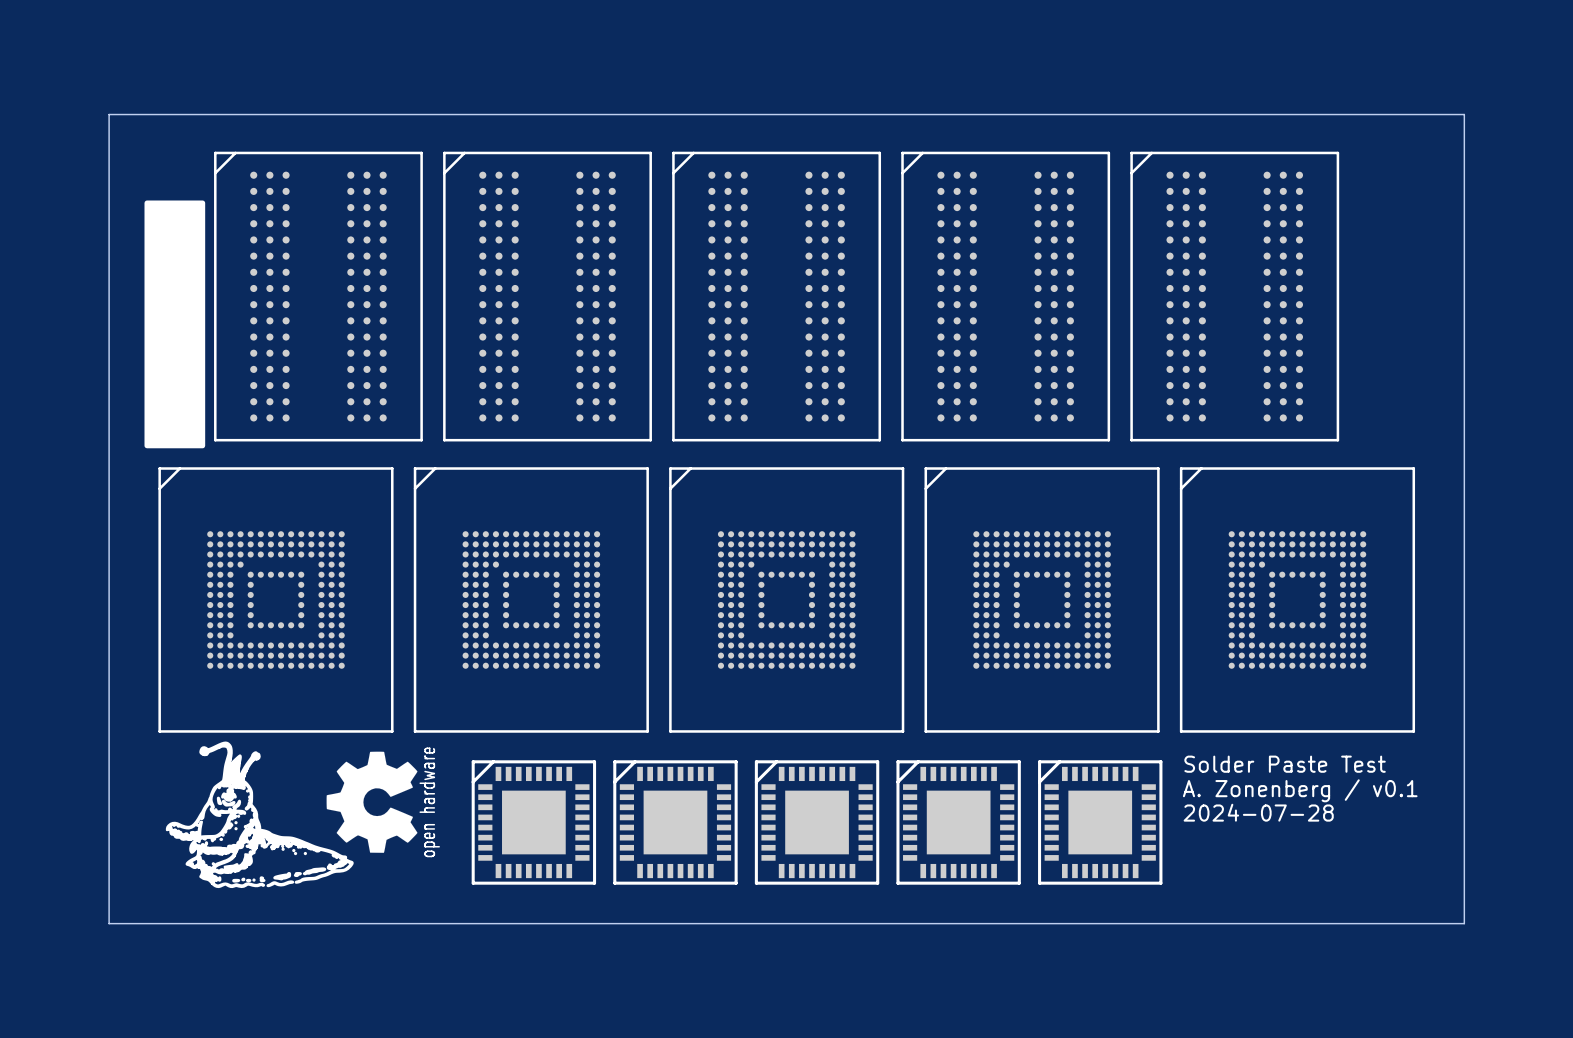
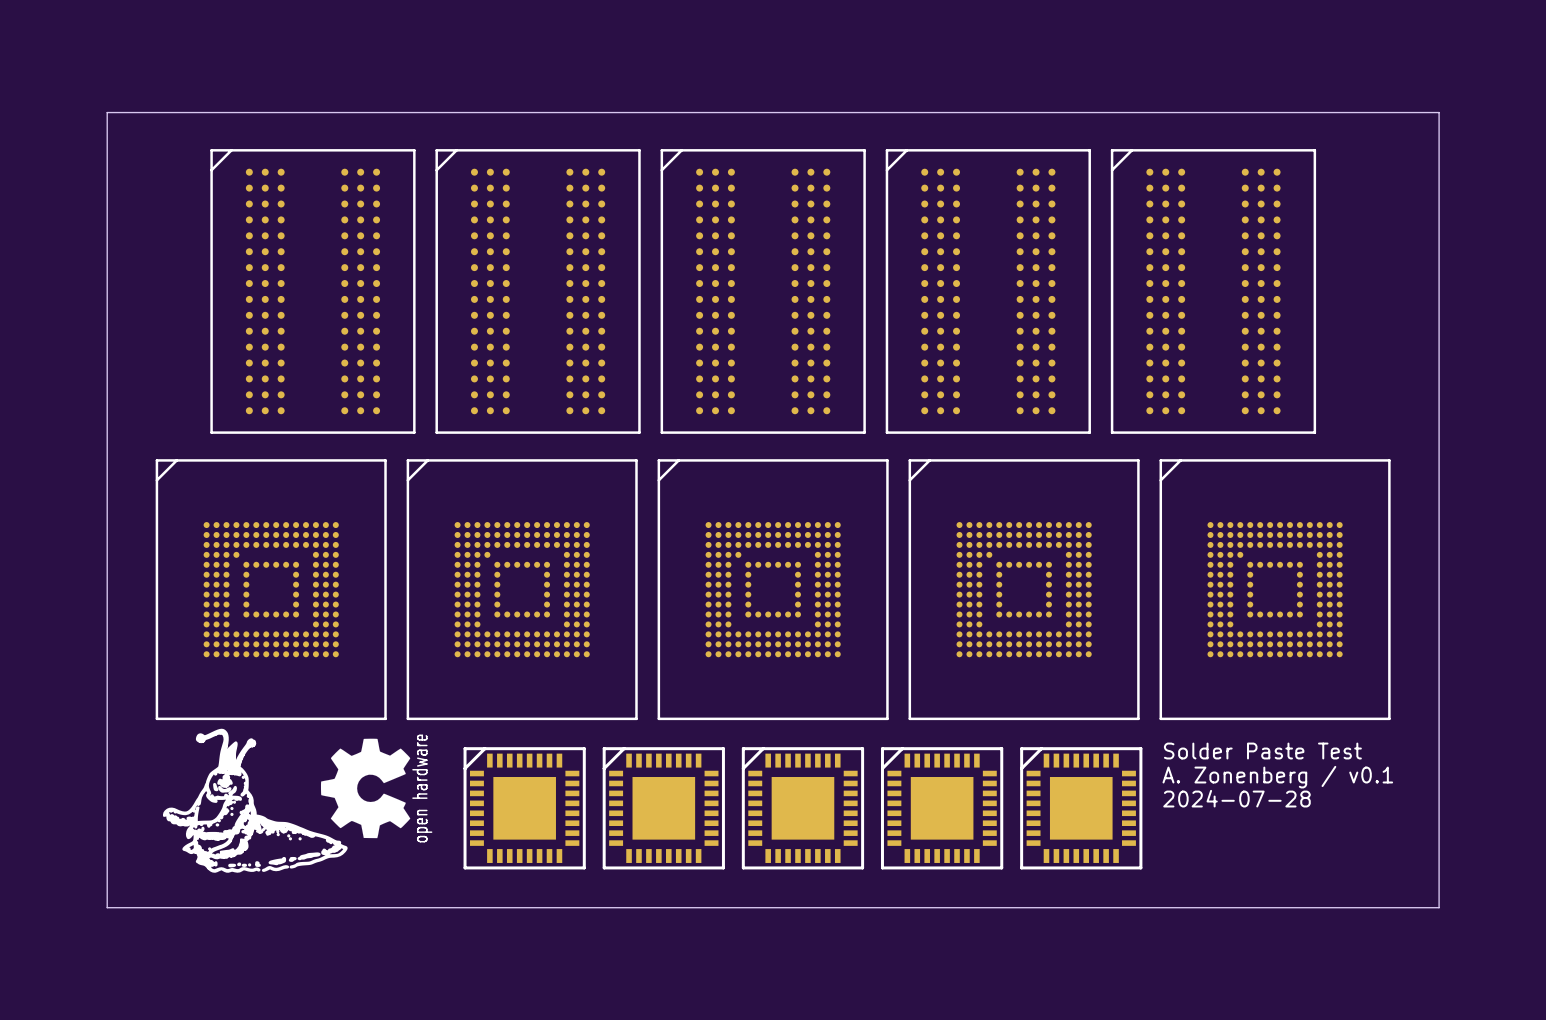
drawing: [144, 200, 206, 449] -> none

